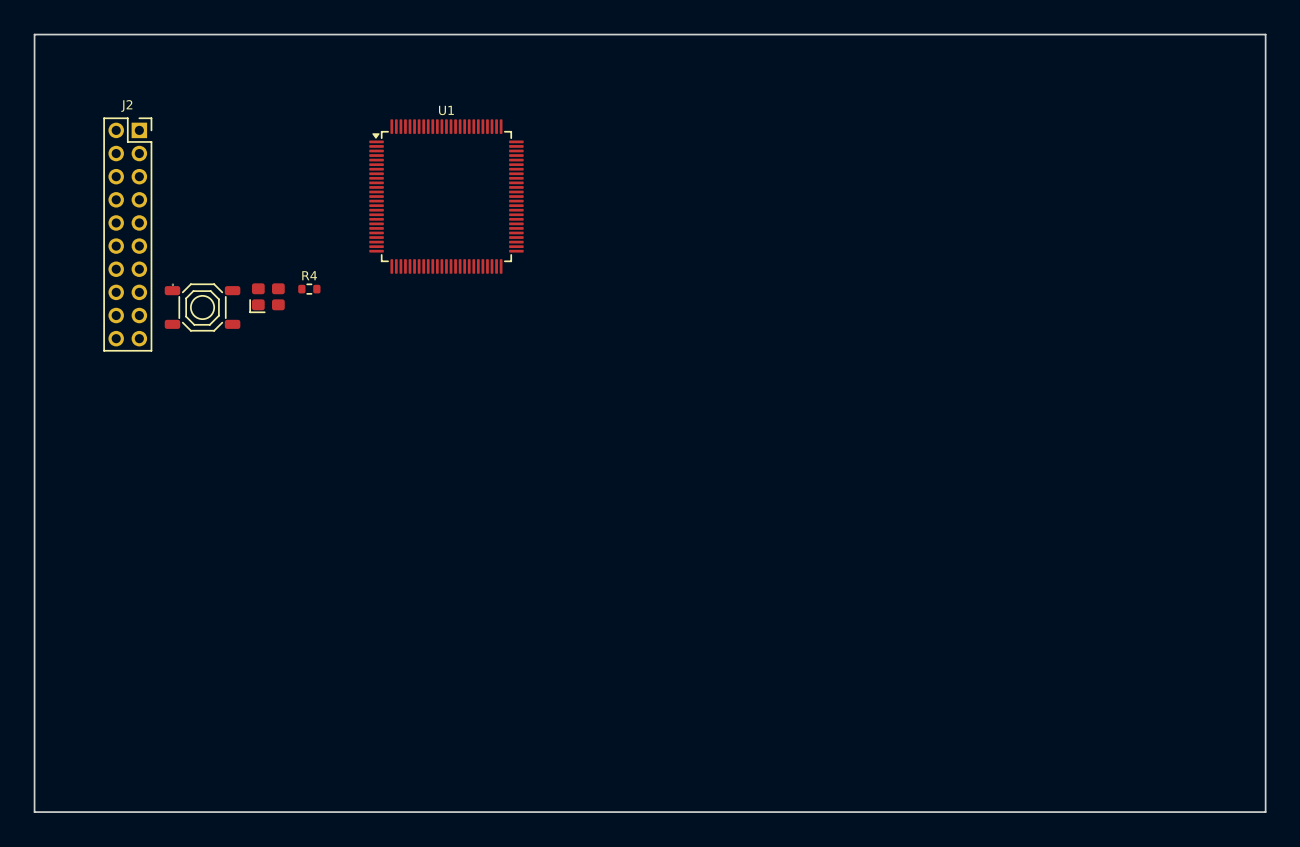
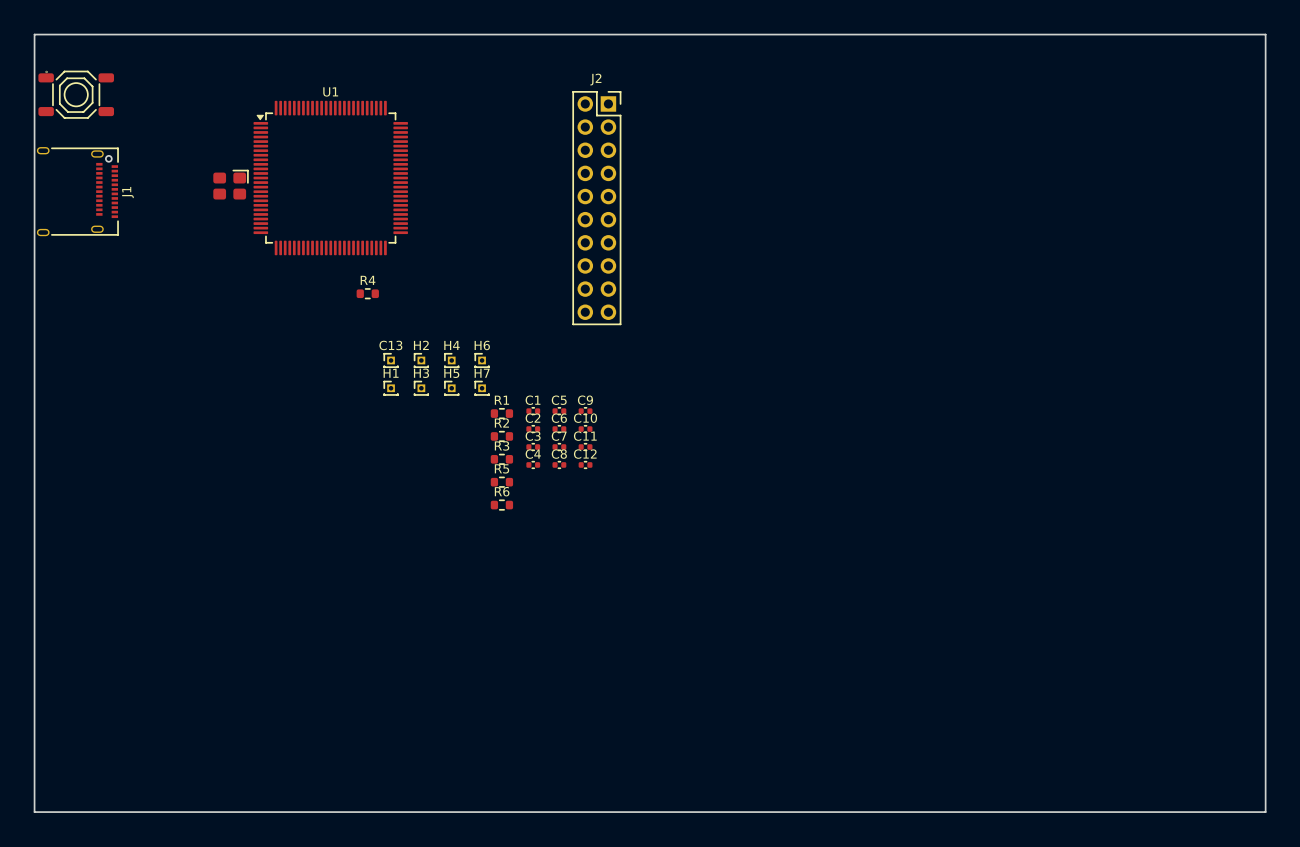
part: none -> (76, 94)
J1: none -> (77, 191)
U1 position: (446, 196) -> (330, 178)
J2 position: (127, 234) -> (596, 208)
R4 position: (309, 289) -> (367, 293)
part rotation: 0° (267, 298) -> 180° (230, 184)
part position: (267, 298) -> (230, 184)
part: (202, 307) -> none
C13: none -> (391, 360)
H2: none -> (421, 360)
H4: none -> (451, 360)
H6: none -> (482, 360)
H1: none -> (391, 388)
H3: none -> (421, 388)
H5: none -> (451, 388)
H7: none -> (482, 388)
C1: none -> (533, 411)
C5: none -> (559, 411)
C9: none -> (585, 411)
R1: none -> (501, 413)
C2: none -> (533, 429)
C6: none -> (559, 429)
C10: none -> (585, 429)
R2: none -> (501, 436)
C3: none -> (533, 447)
C7: none -> (559, 447)
C11: none -> (585, 447)
R3: none -> (501, 459)
C4: none -> (533, 464)
C8: none -> (559, 464)
C12: none -> (585, 464)
R5: none -> (501, 482)
R6: none -> (501, 505)

